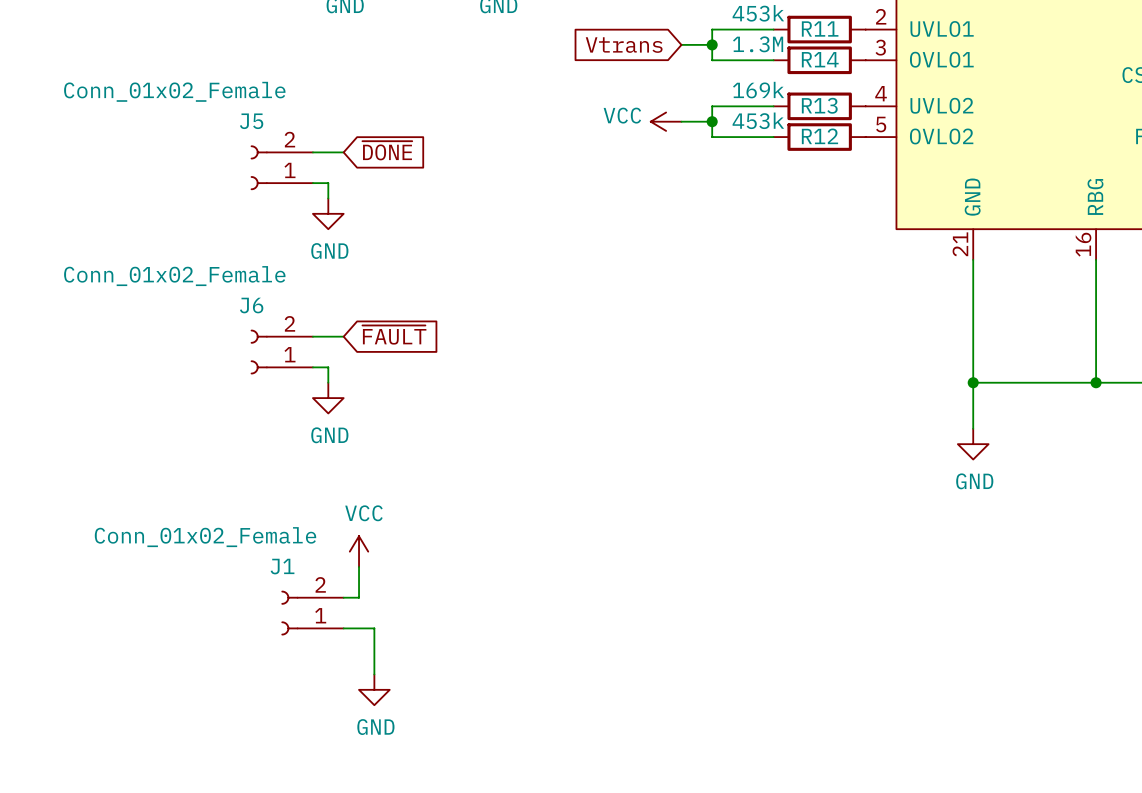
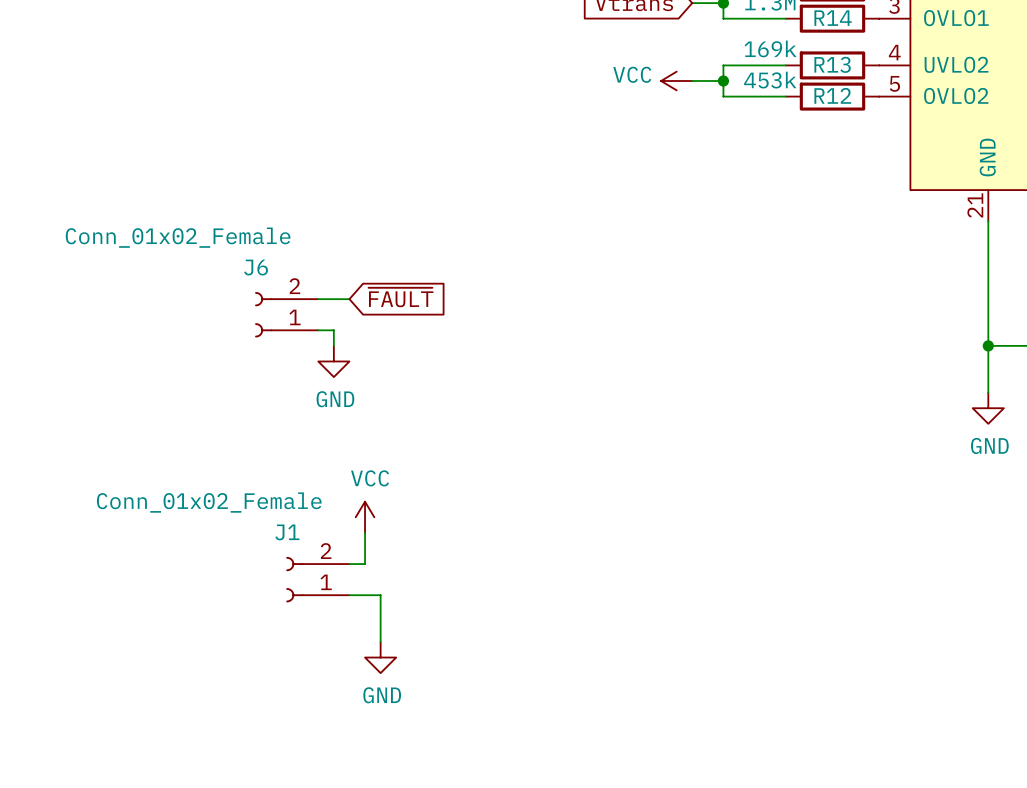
global label: ~{DONE} (387, 150) -> none
wire: (312, 152) (343, 152) -> none
J5: Conn_01x02_Female (281, 167) -> none
wire: (312, 183) (328, 183) (328, 198) -> none
power symbol: GND (328, 213) -> none

